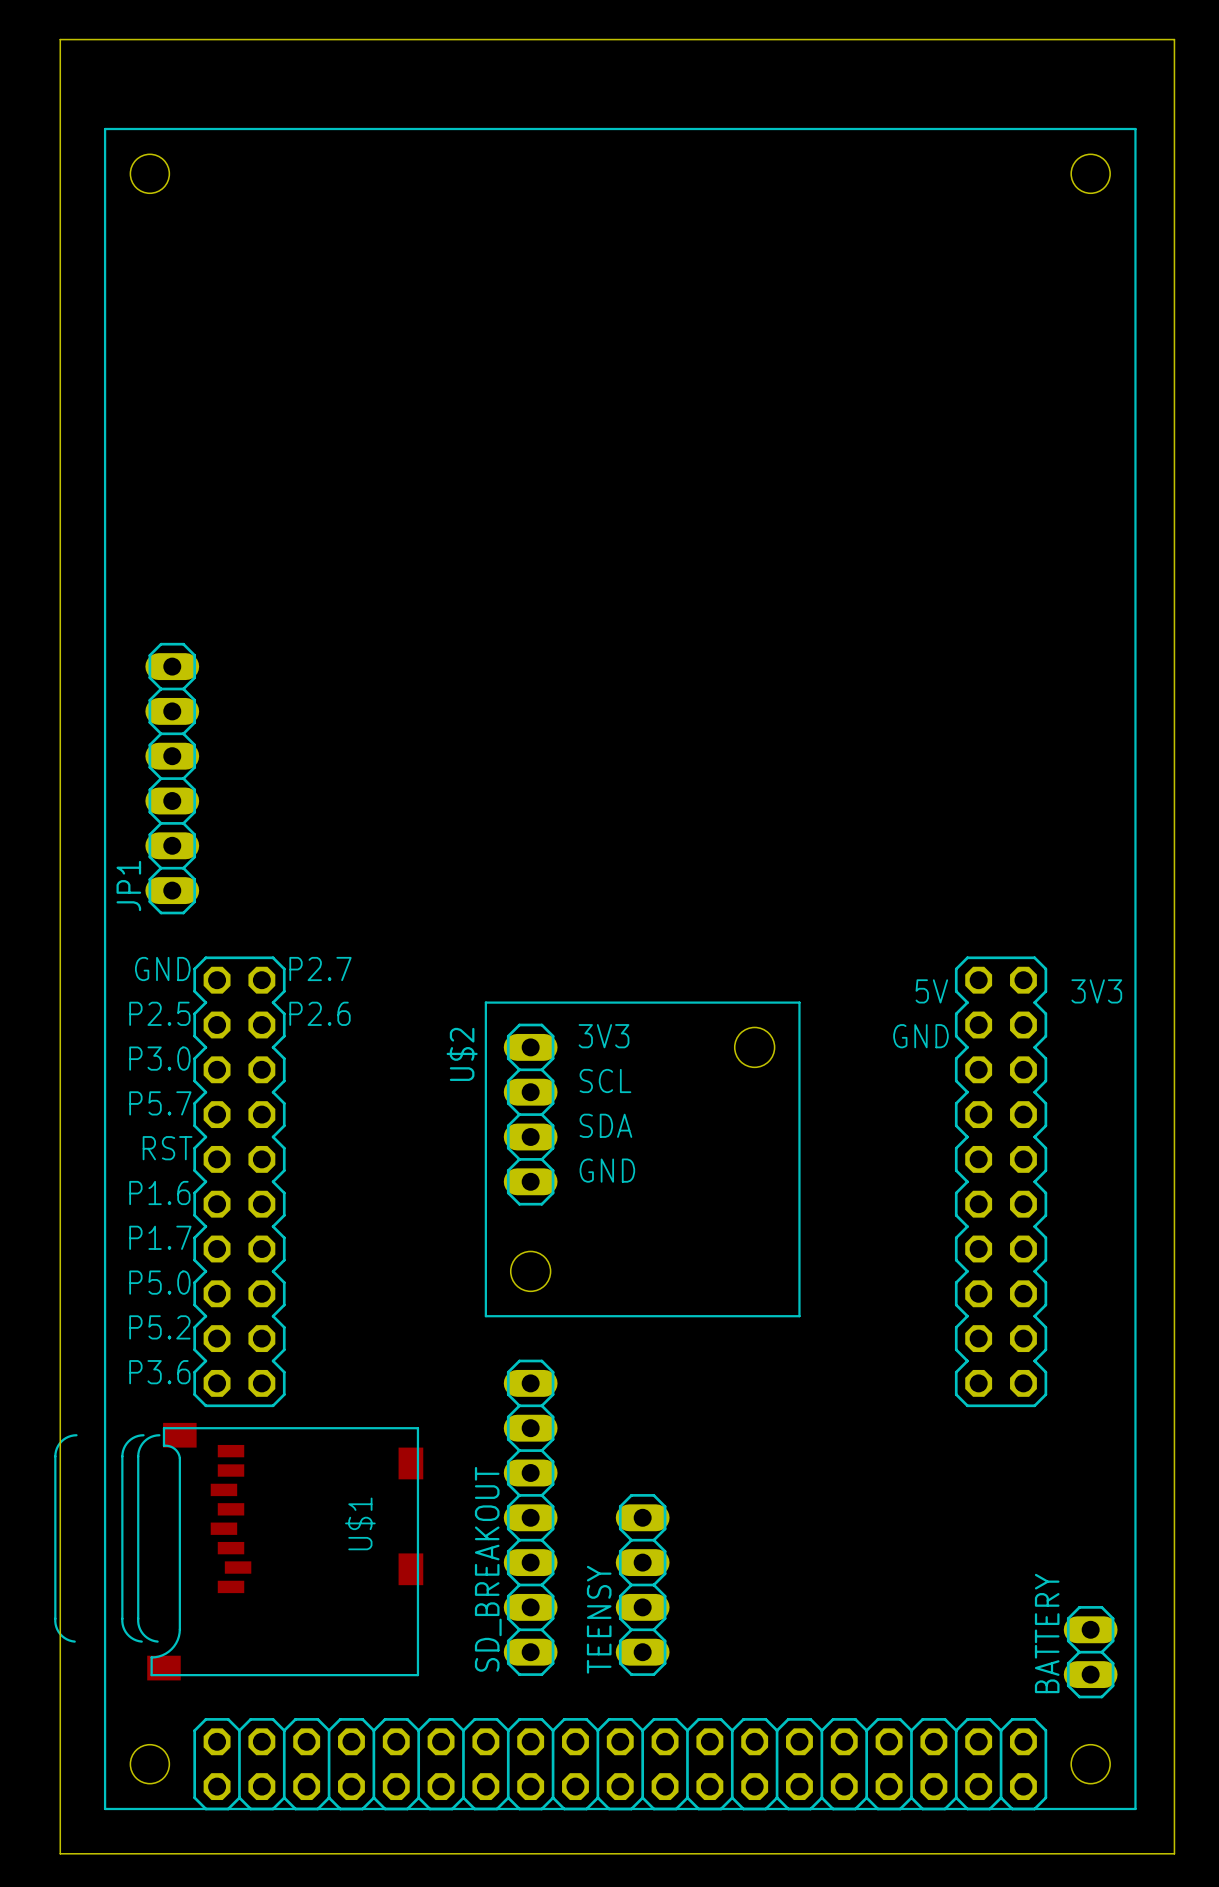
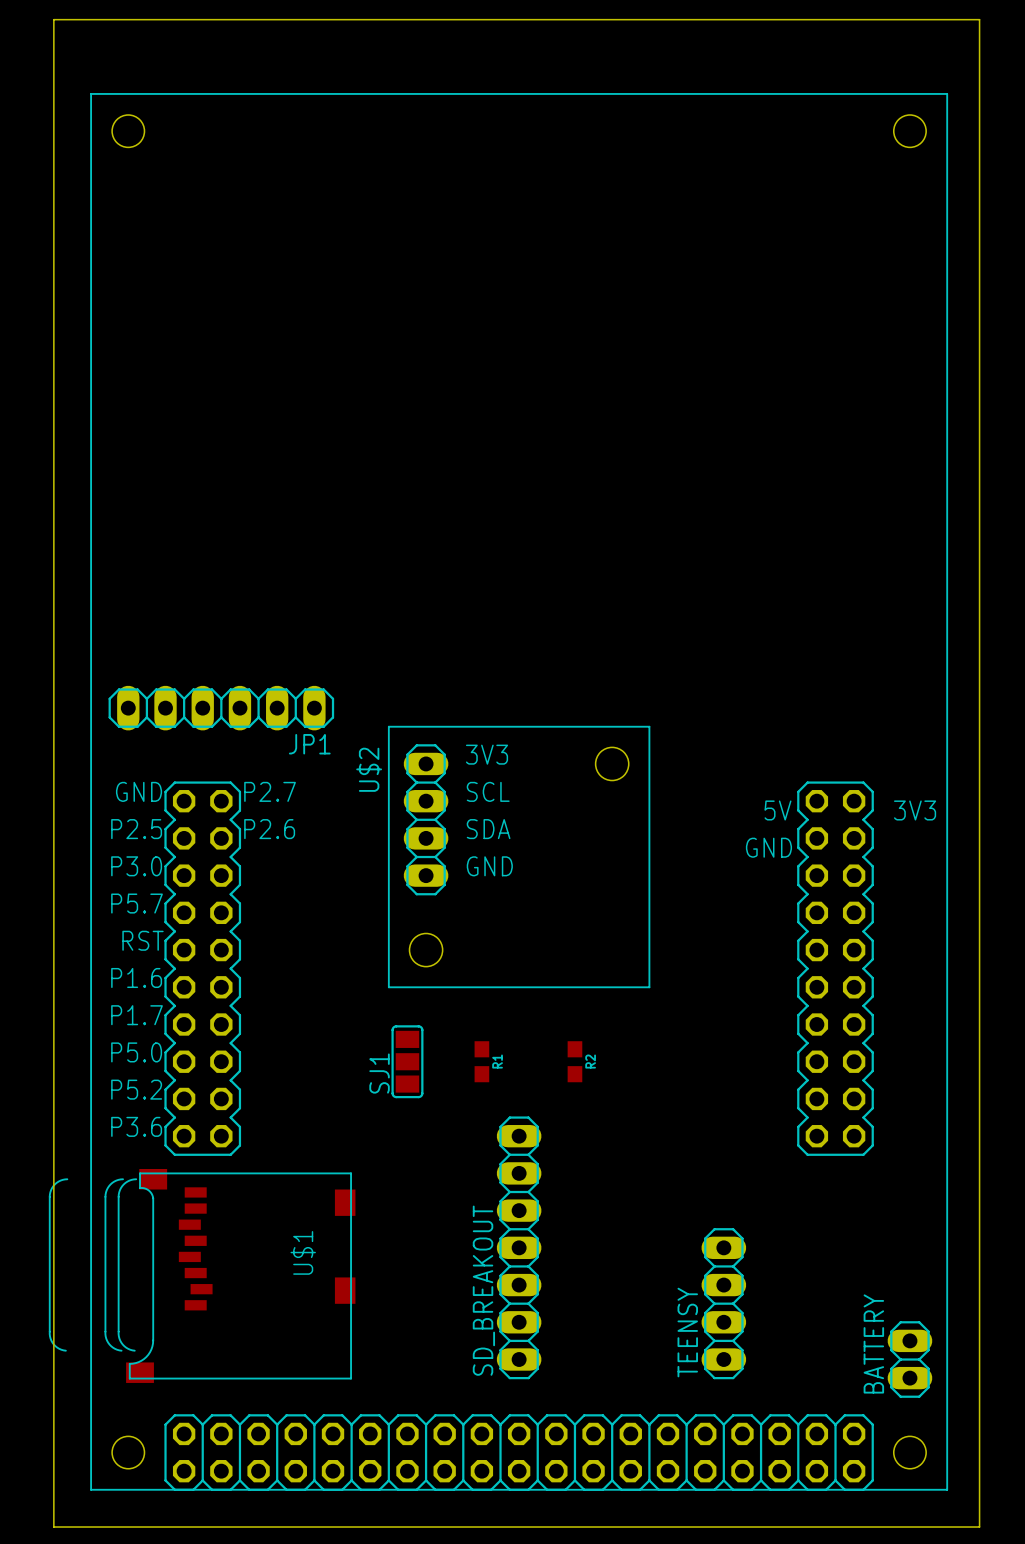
JP1 rotation: 0° (172, 778) -> 90° clockwise (221, 708)
JP1 name position: JP1 (128, 885) -> JP1 (309, 744)
U$2 position: (642, 1159) -> (519, 857)
SJ1: none -> (407, 1061)
R1: none -> (481, 1061)
R2: none -> (574, 1061)
SD_BREAKOUT position: (530, 1517) -> (519, 1247)
TEENSY position: (642, 1584) -> (723, 1303)

